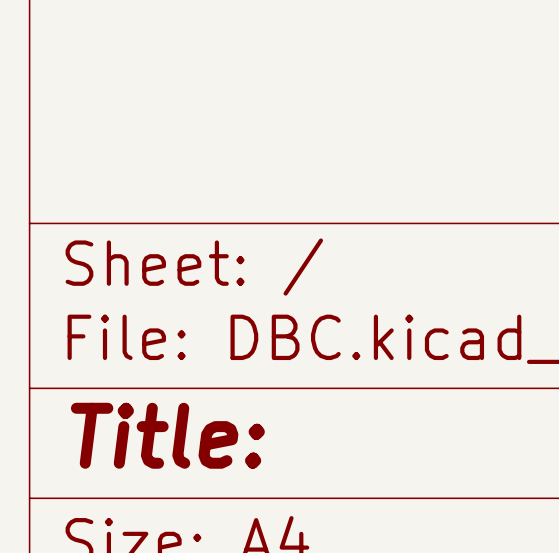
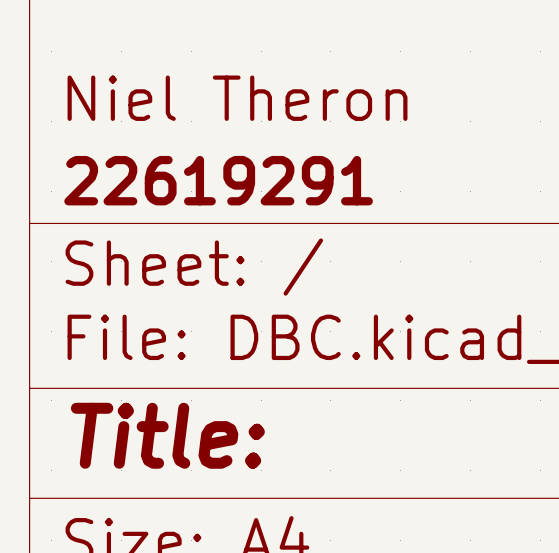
title block: none -> Niel Theron (237, 98)
title block: none -> 22619291 (218, 180)

